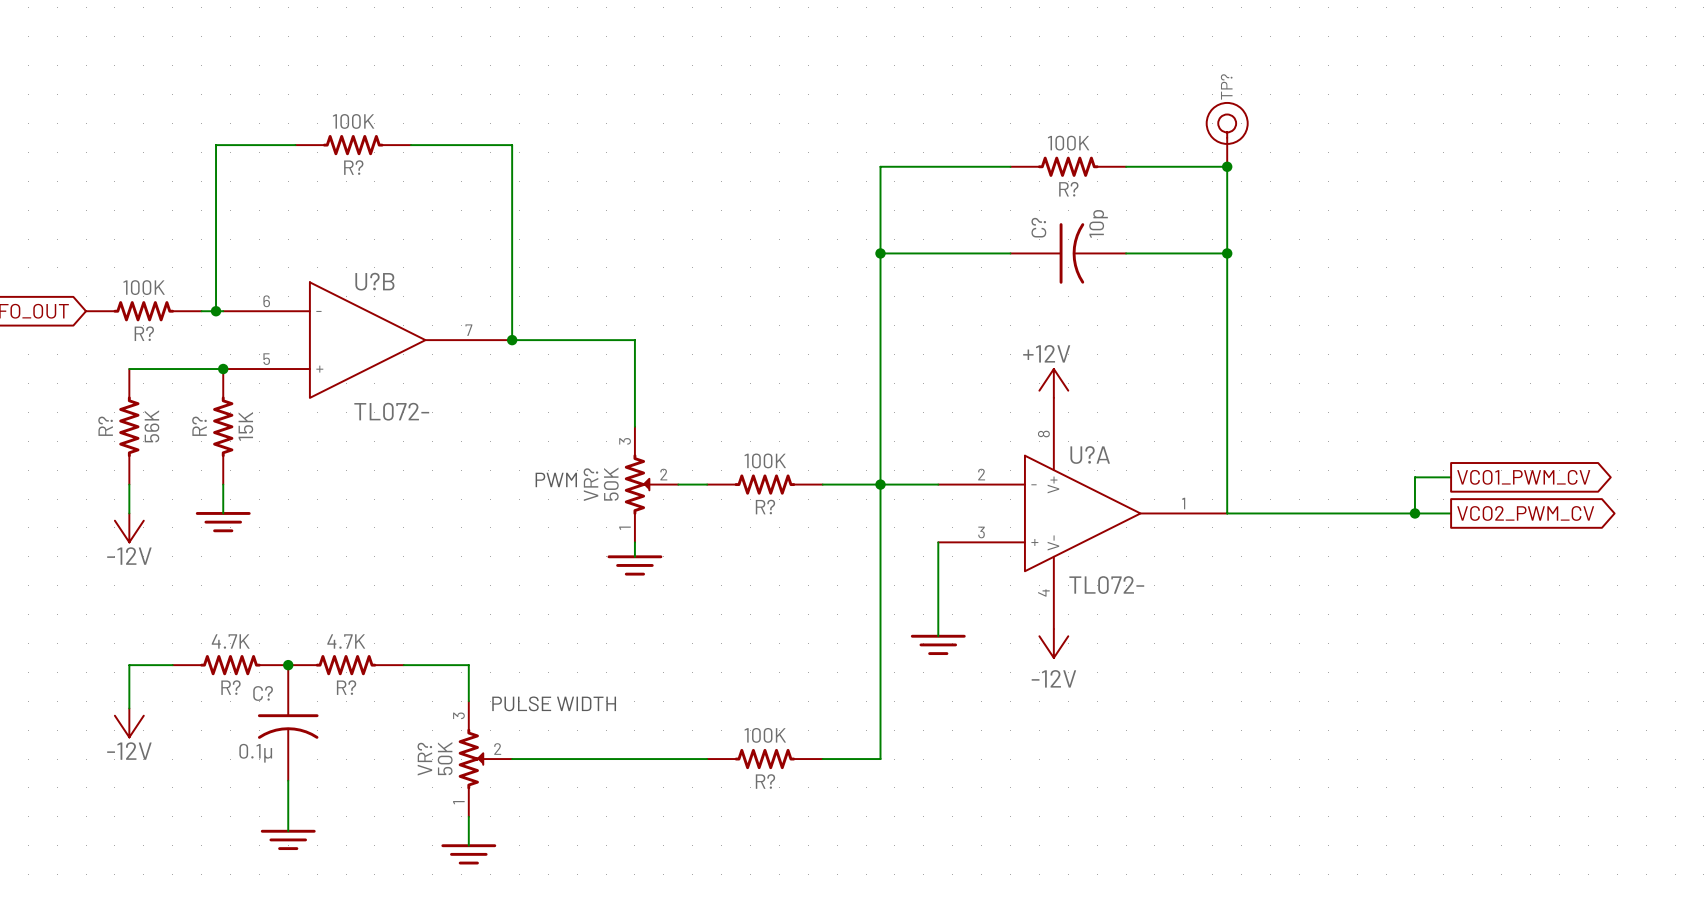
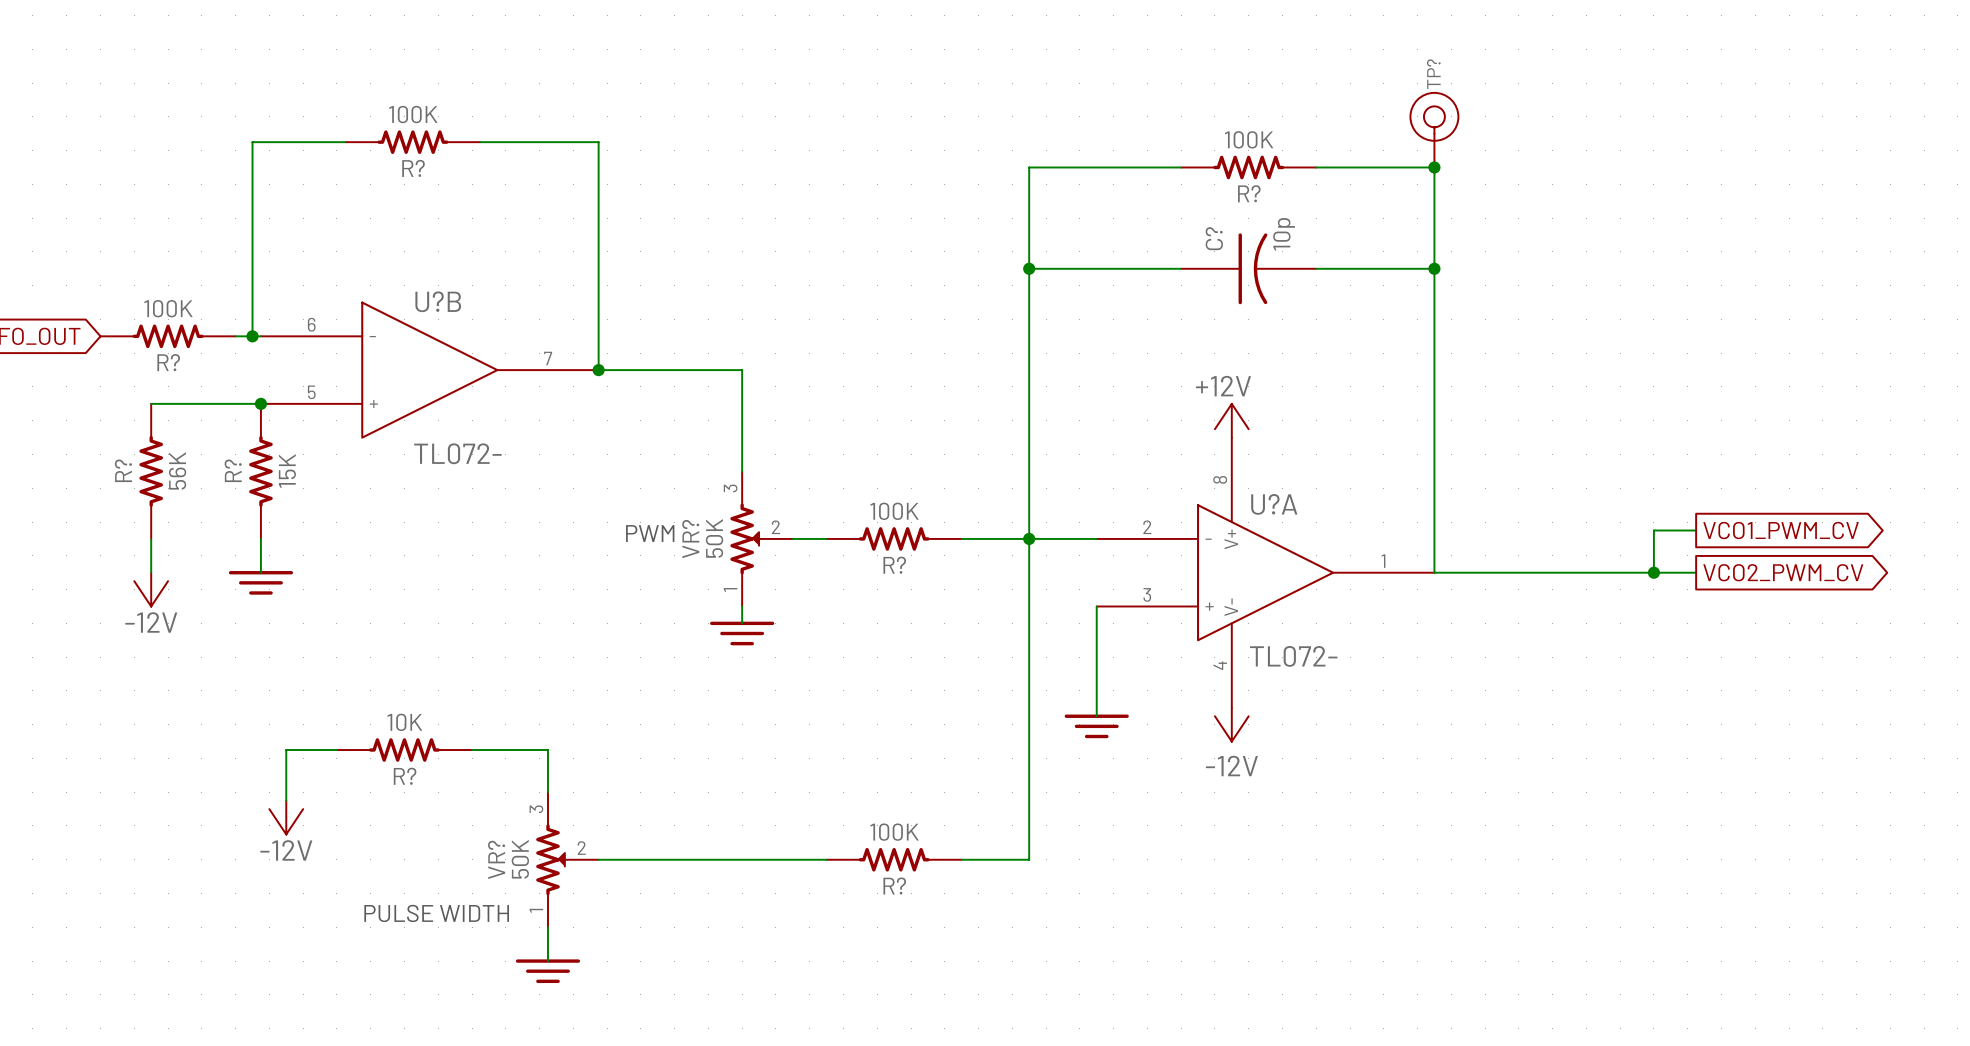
R? value: 4.7K (346, 641) -> 10K (404, 722)
wire: (172, 665) (129, 665) (129, 708) -> (336, 750) (286, 750) (286, 800)
R?: 4.7K (230, 665) -> none
junction: (288, 665) -> none
text position: PULSE WIDTH (554, 703) -> PULSE WIDTH (436, 913)
power symbol position: -12V (129, 722) -> -12V (286, 817)
C?: 0.1μ (288, 722) -> none
wire: (288, 780) (288, 831) -> none
power symbol: (288, 839) -> none

